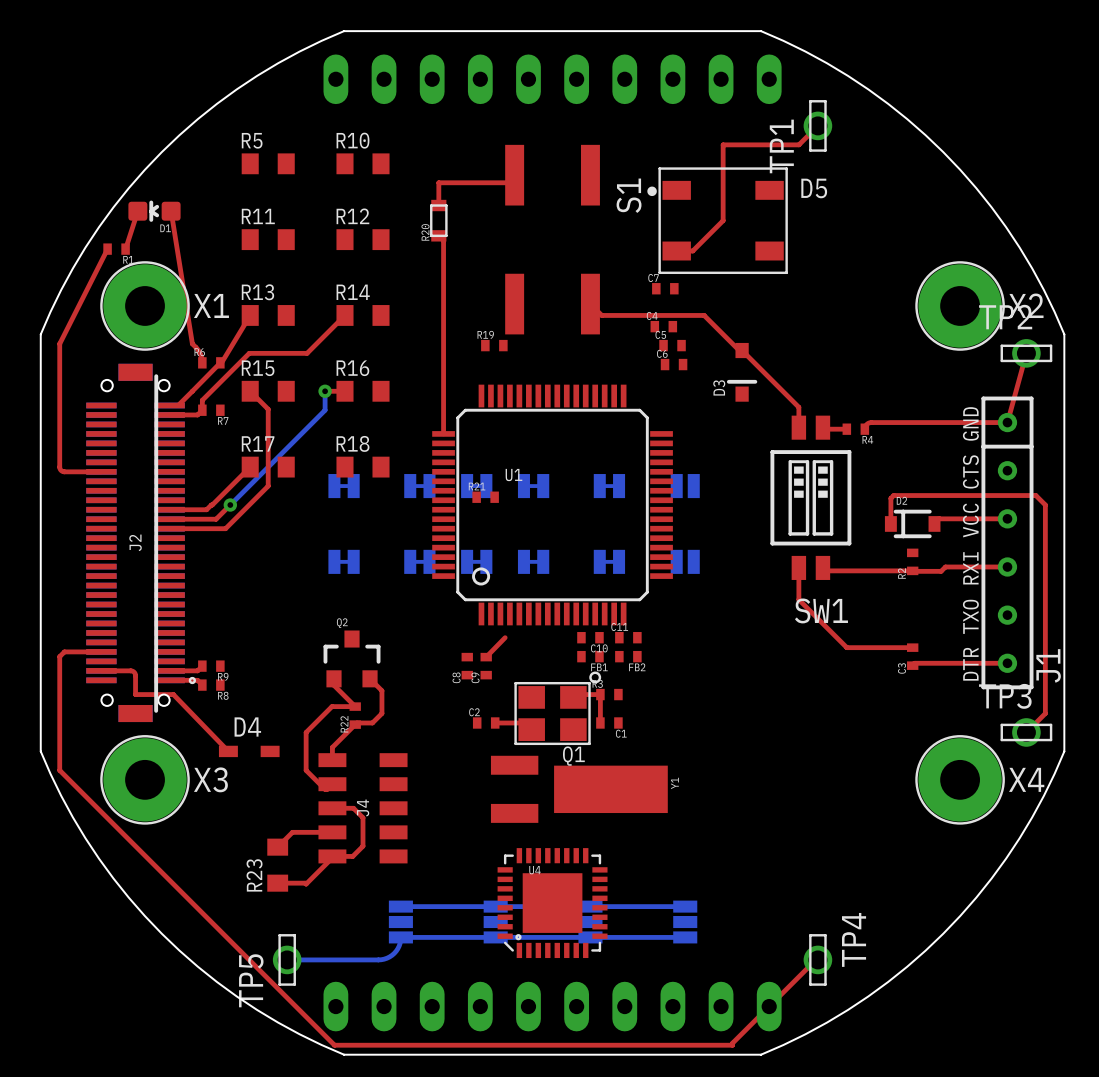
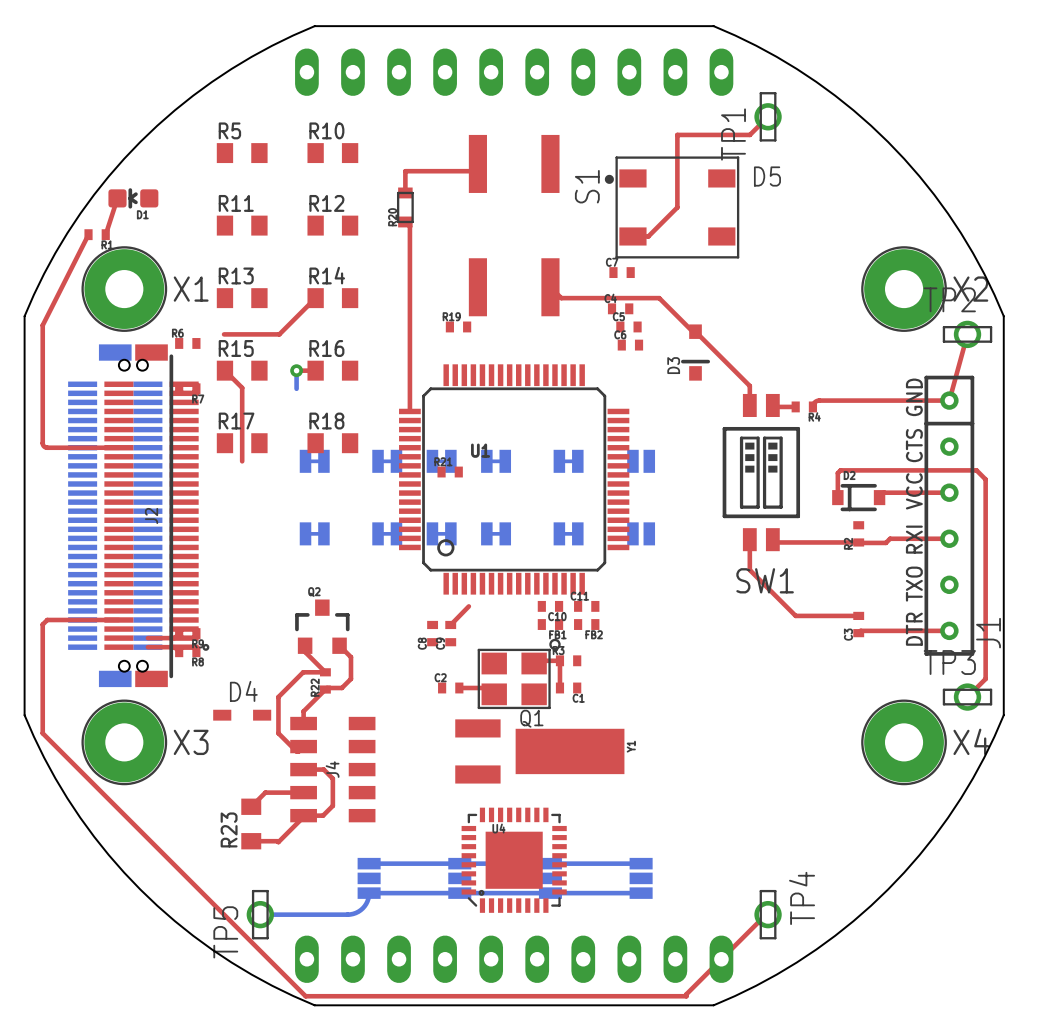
top track: (171, 211) (192, 343) (199, 351) (202, 362) -> none
top track: (250, 315) (221, 363) (178, 405) (169, 405) -> none
top track: (249, 353) (202, 400) (202, 410) (197, 414) (169, 414) -> none
bottom track: (325, 410) (230, 505) -> none
top track: (250, 467) (206, 509) (169, 509) -> none
top track: none -> (82, 447) (118, 447)
top track: (268, 486) (225, 528) (169, 528) -> none
top track: (230, 505) (216, 519) (169, 519) -> none
via: (230, 505) -> none
J2 position: (141, 542) -> (156, 515)
top track: none -> (82, 619) (118, 619)
top track: (101, 670) (133, 671) (135, 674) (135, 694) (173, 694) (228, 751) -> none
D4 position: (249, 751) -> (242, 715)

